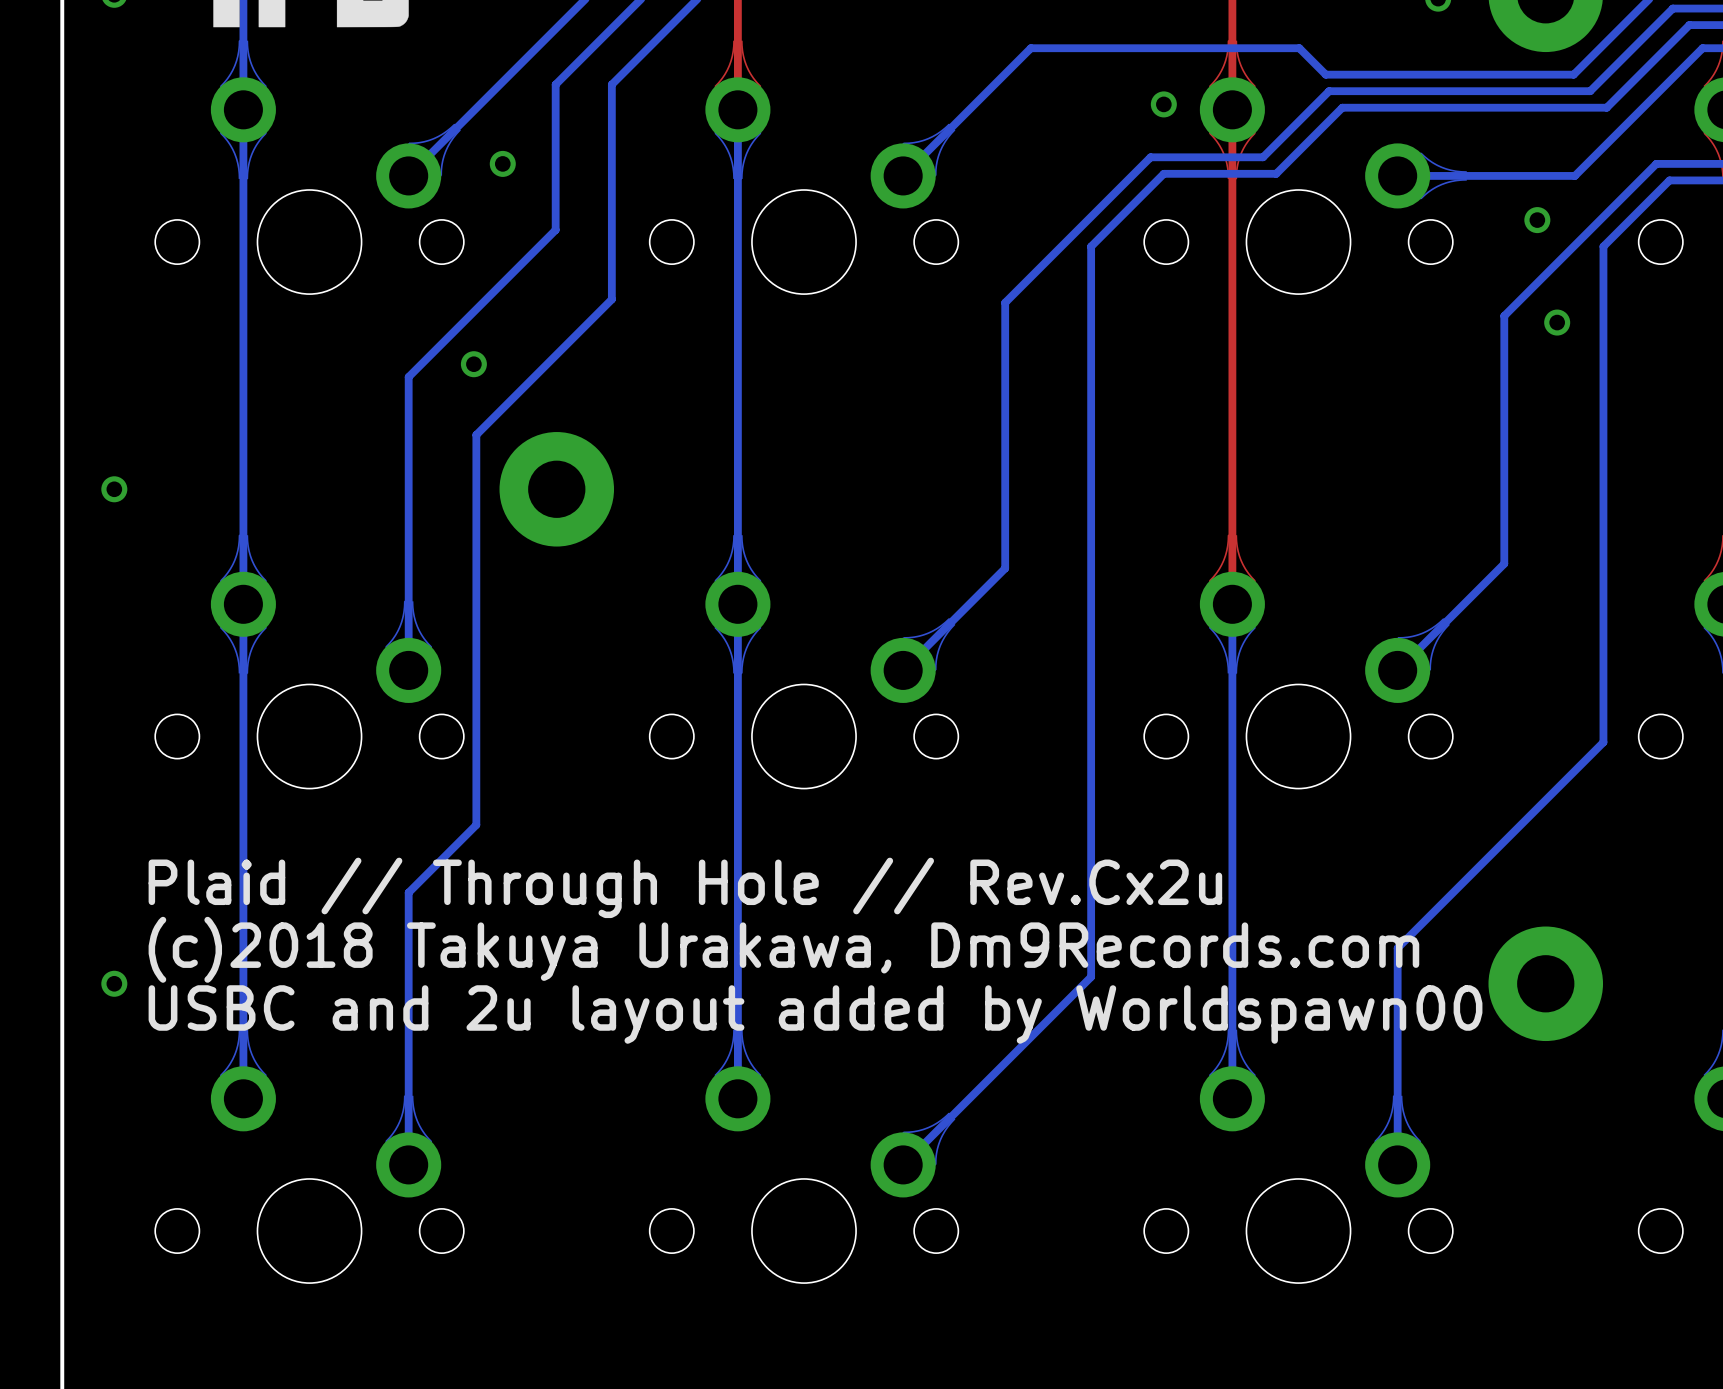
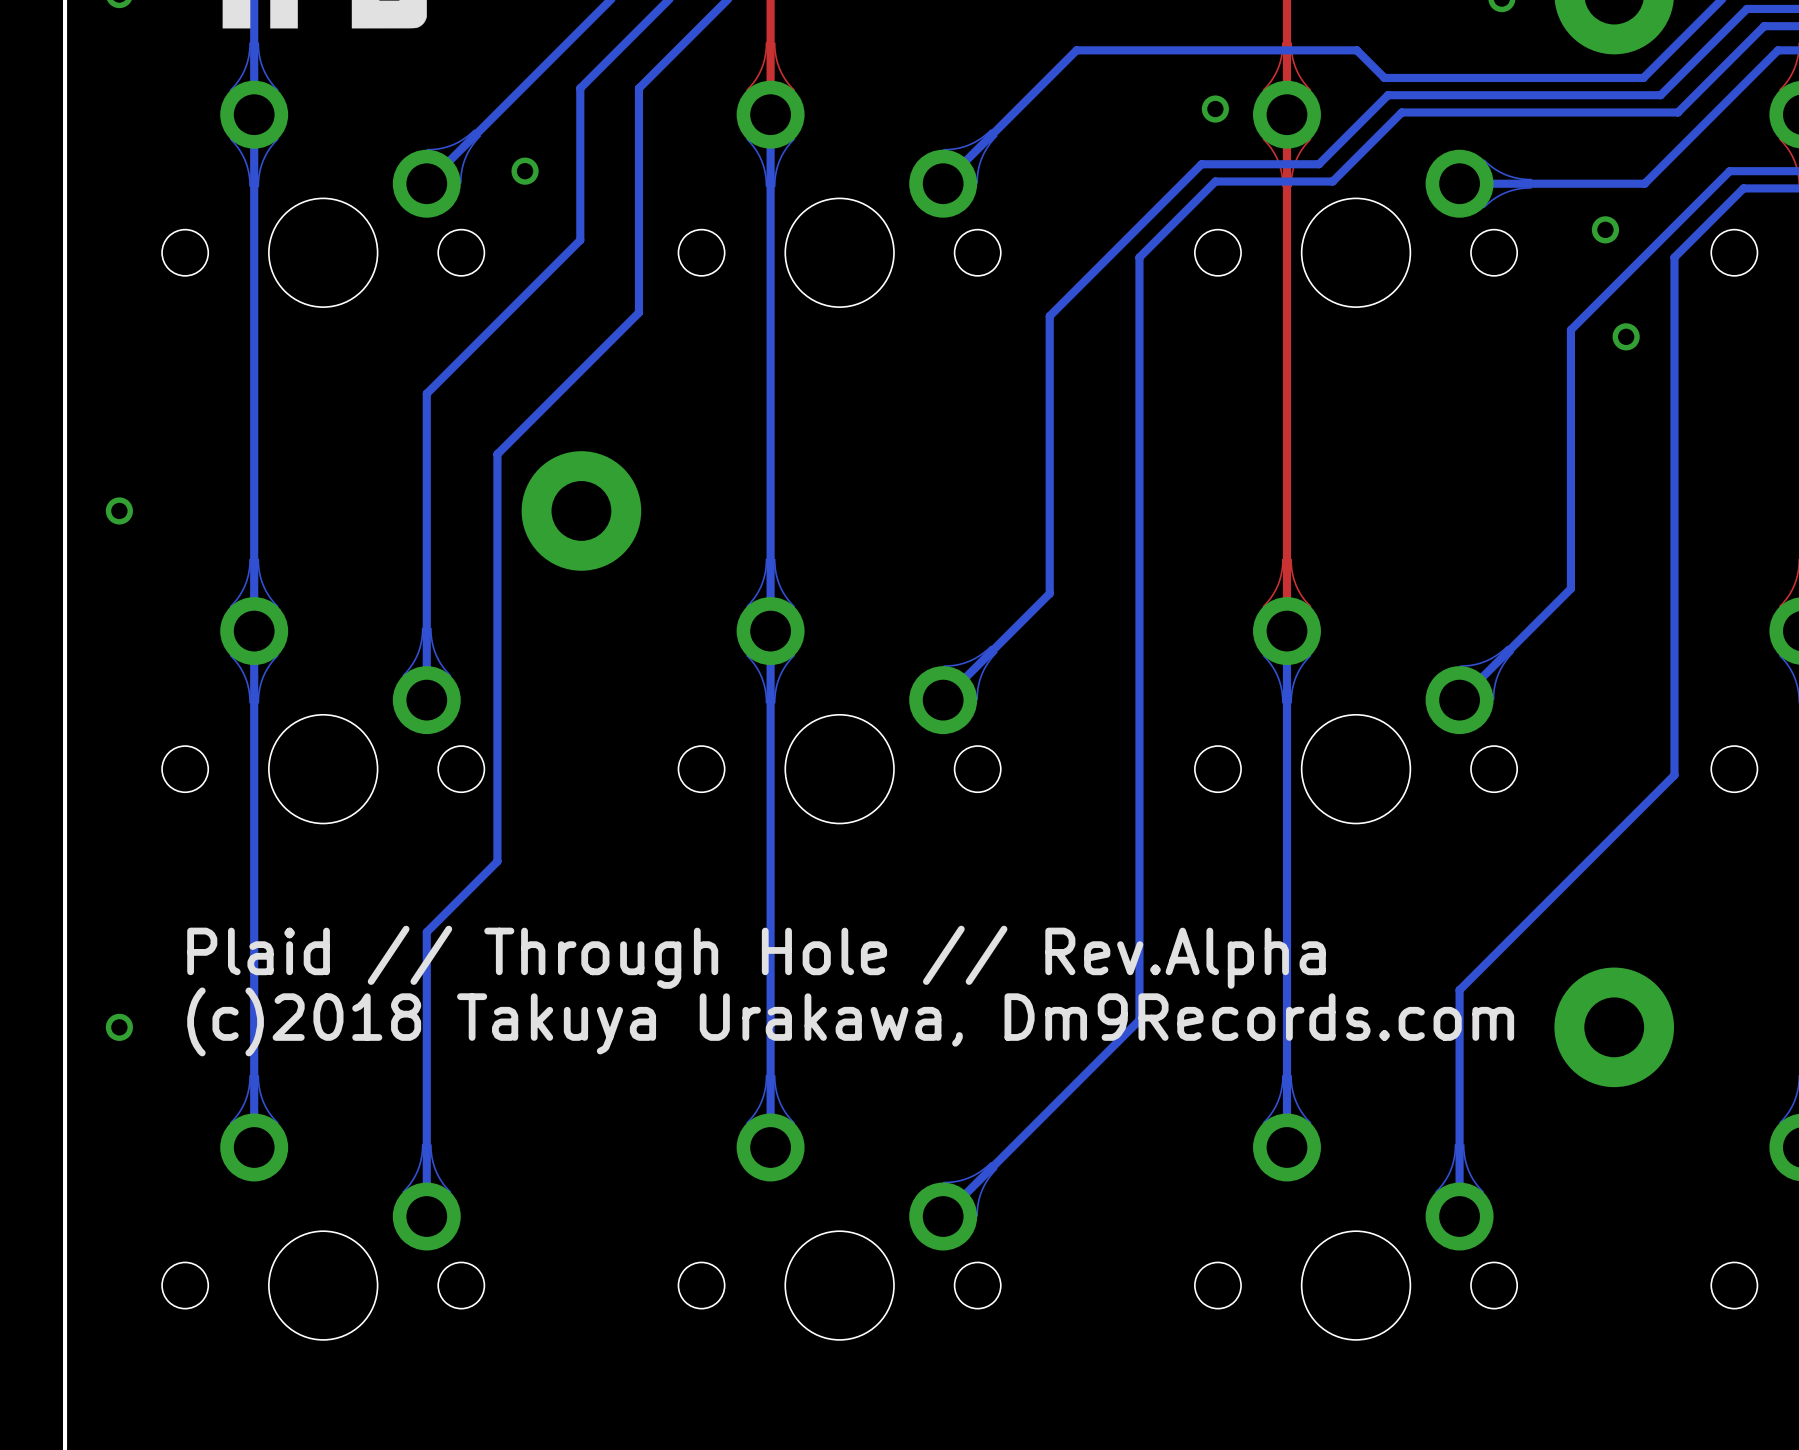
via: (473, 364) -> none
text: Plaid // Through Hole // Rev.Cx2u (685, 887) -> Plaid // Through Hole // Rev.Alpha (756, 957)
text position: (c)2018 Takuya Urakawa, Dm9Records.com (783, 949) -> (c)2018 Takuya Urakawa, Dm9Records.com (850, 1021)
text: USBC and 2u layout added by Worldspawn00 (815, 1014) -> none

